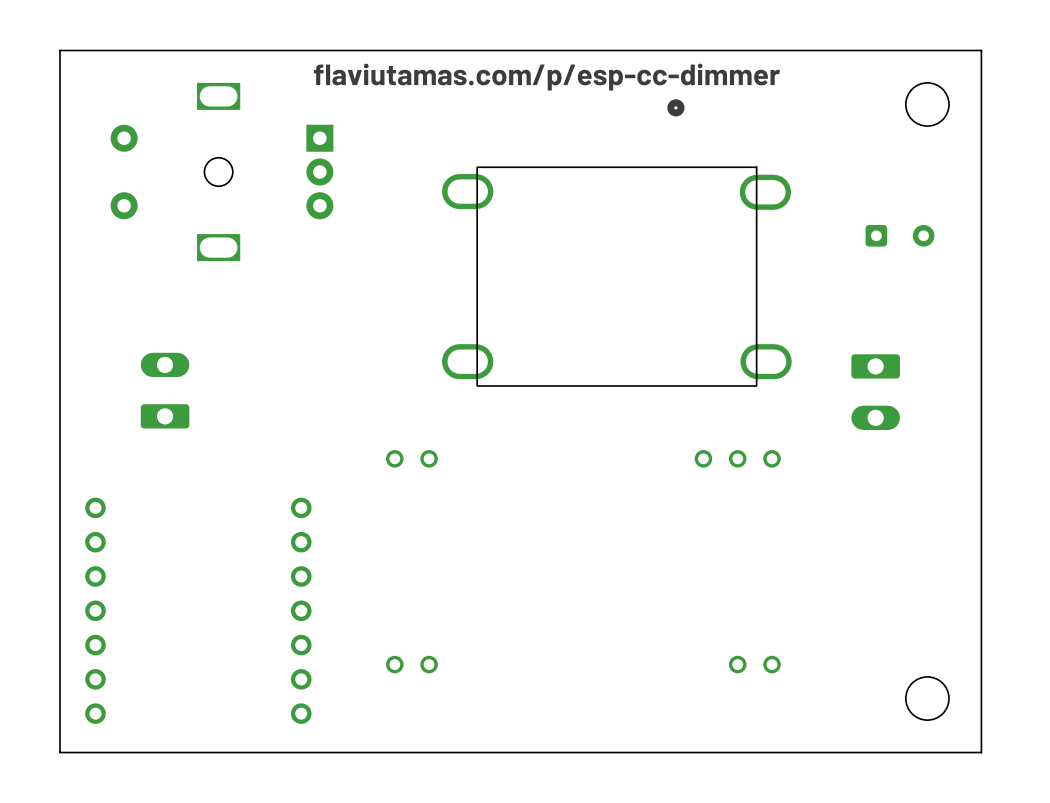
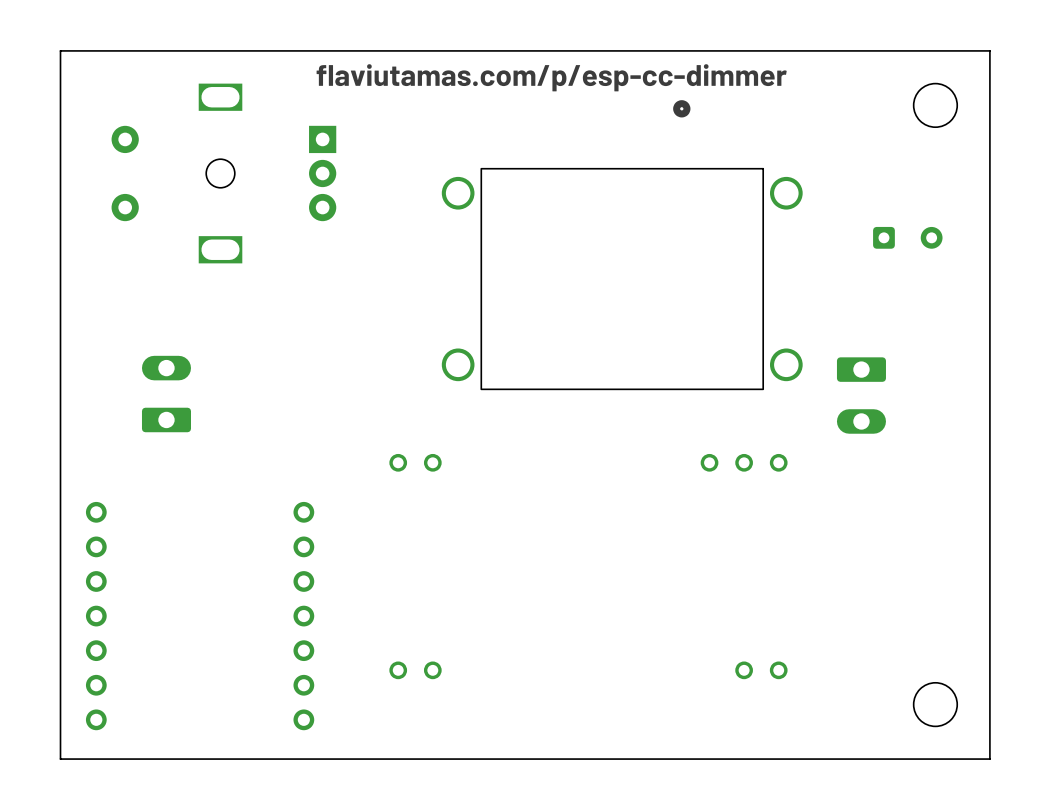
part footprint: [442, 166, 792, 387] -> [441, 168, 803, 390]
part: none -> (861, 395)
part: (875, 392) -> none

